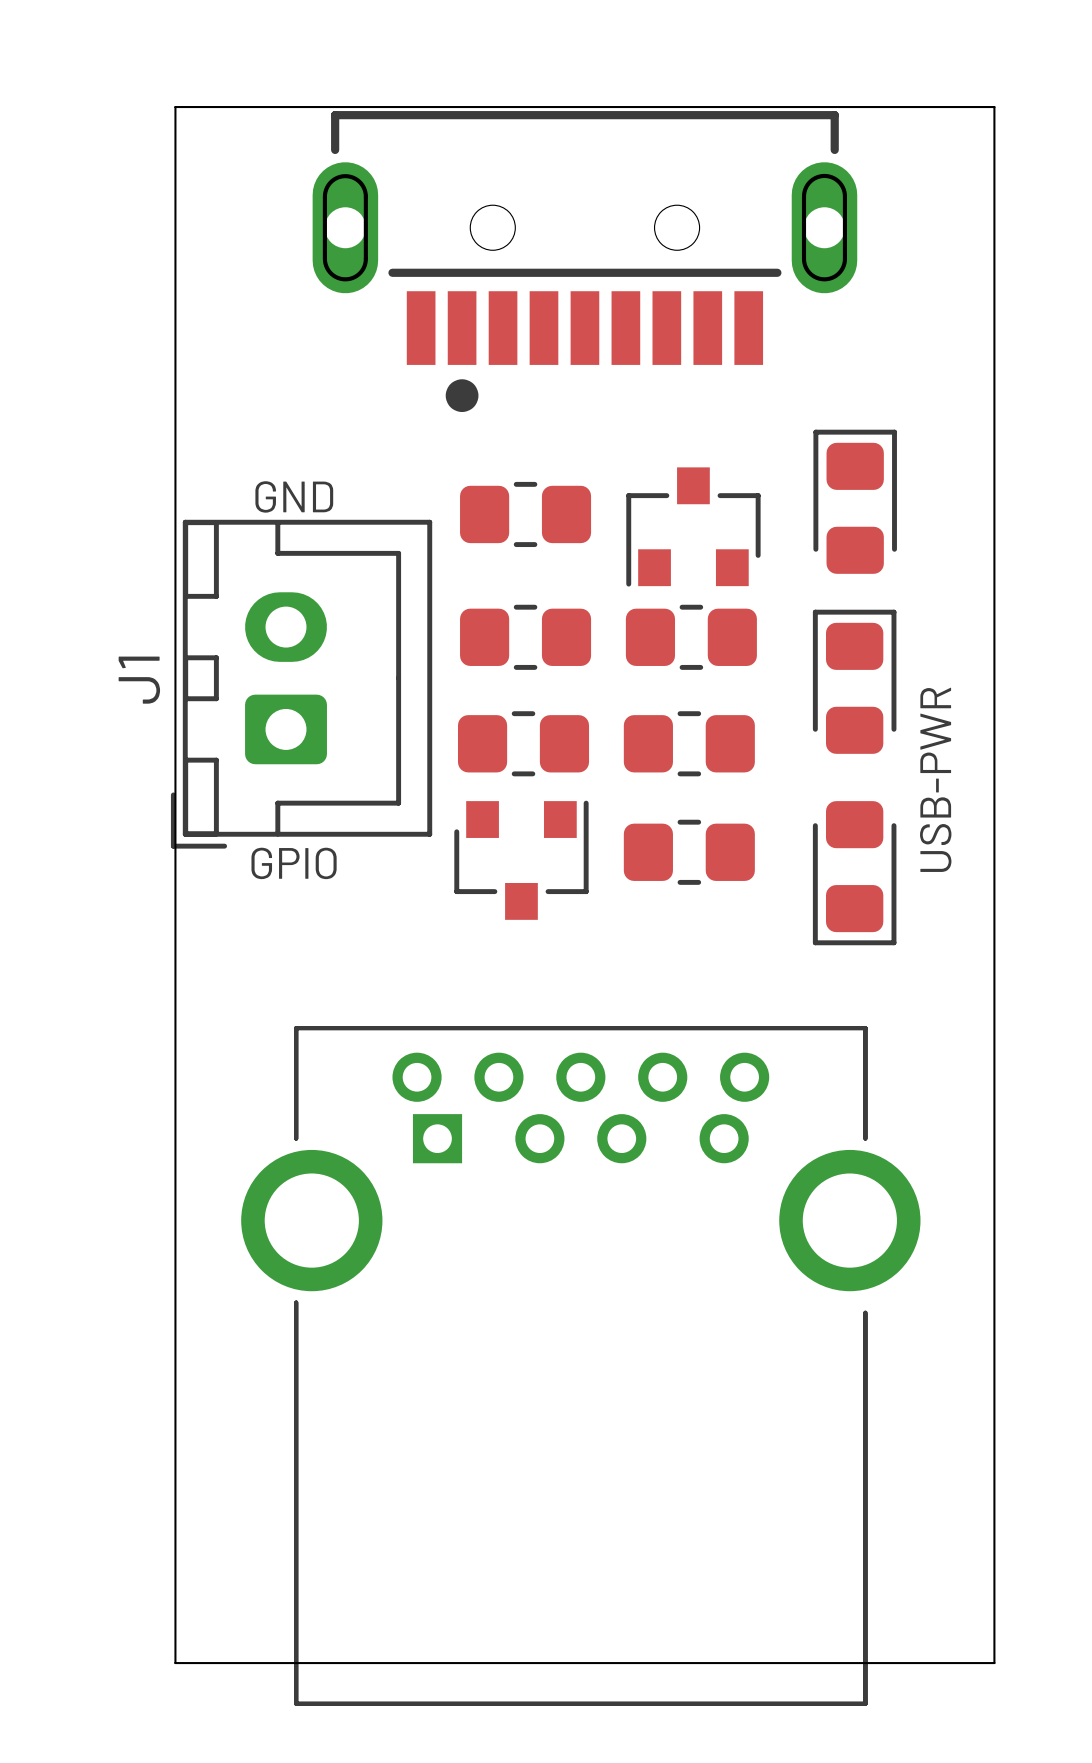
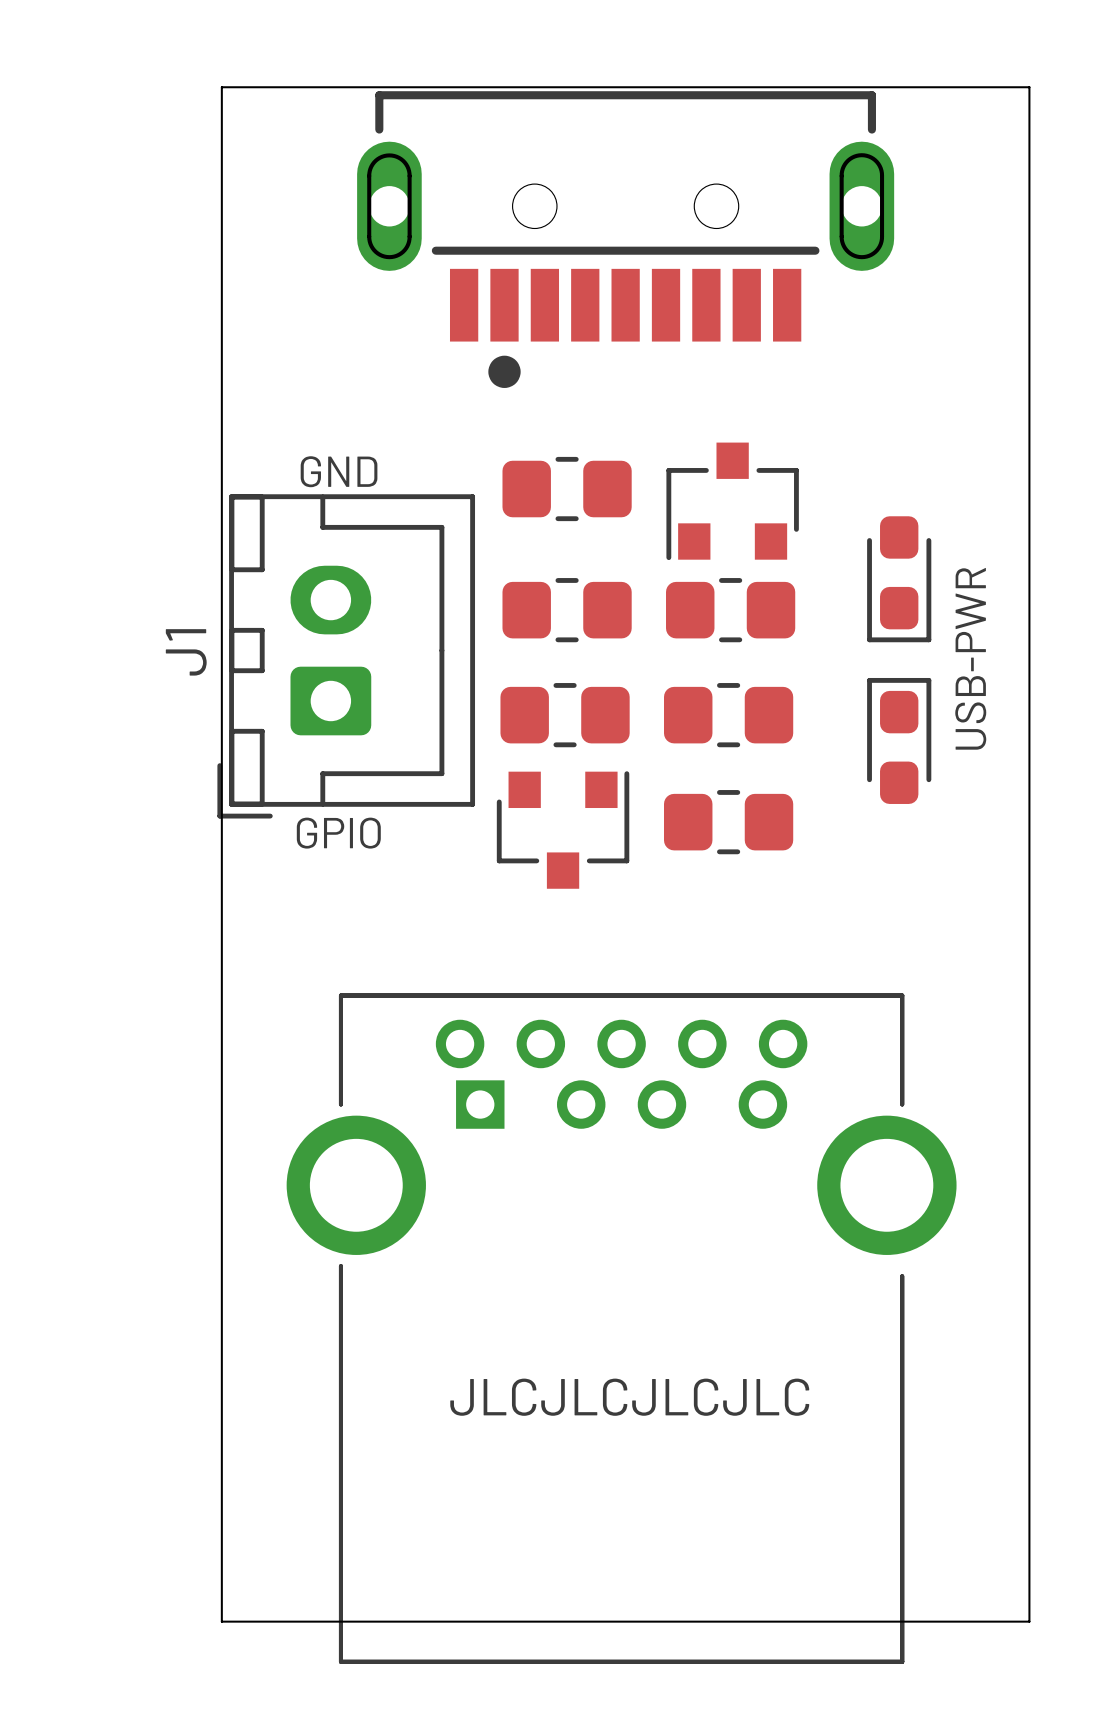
part: (855, 501) -> none
part: none -> (899, 579)
part: (854, 681) -> none
part: none -> (899, 740)
text position: USB-PWR (935, 779) -> USB-PWR (970, 658)
part: (854, 873) -> none
text: none -> JLCJLCJLCJLC (629, 1397)

